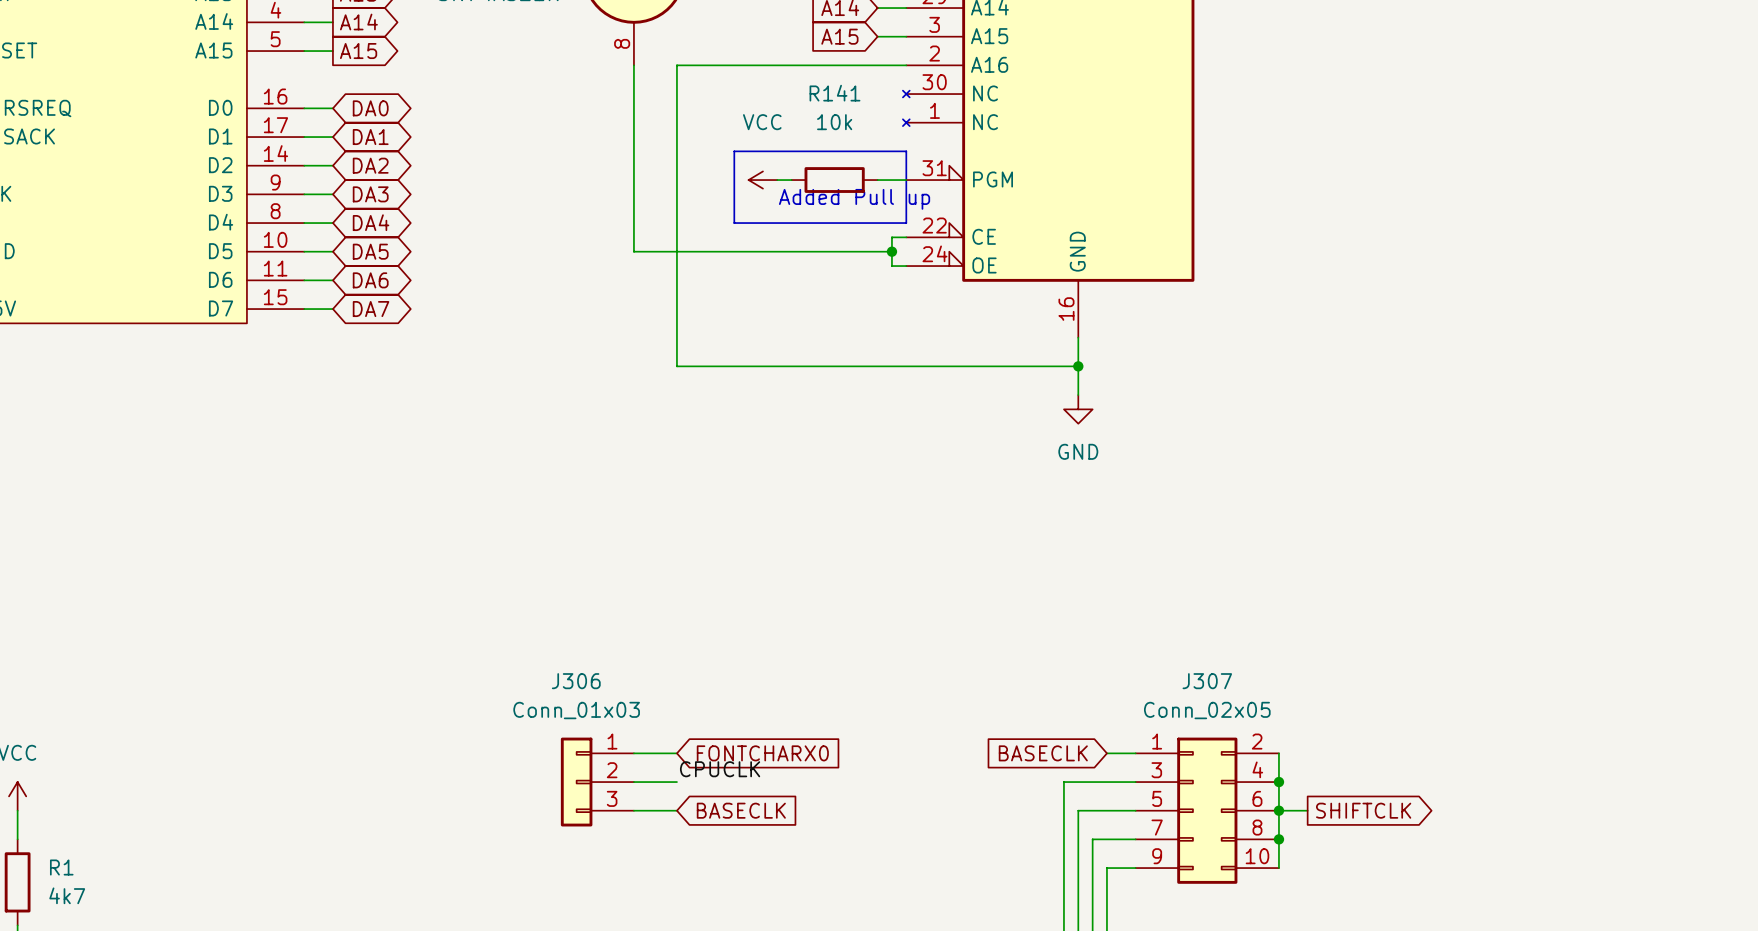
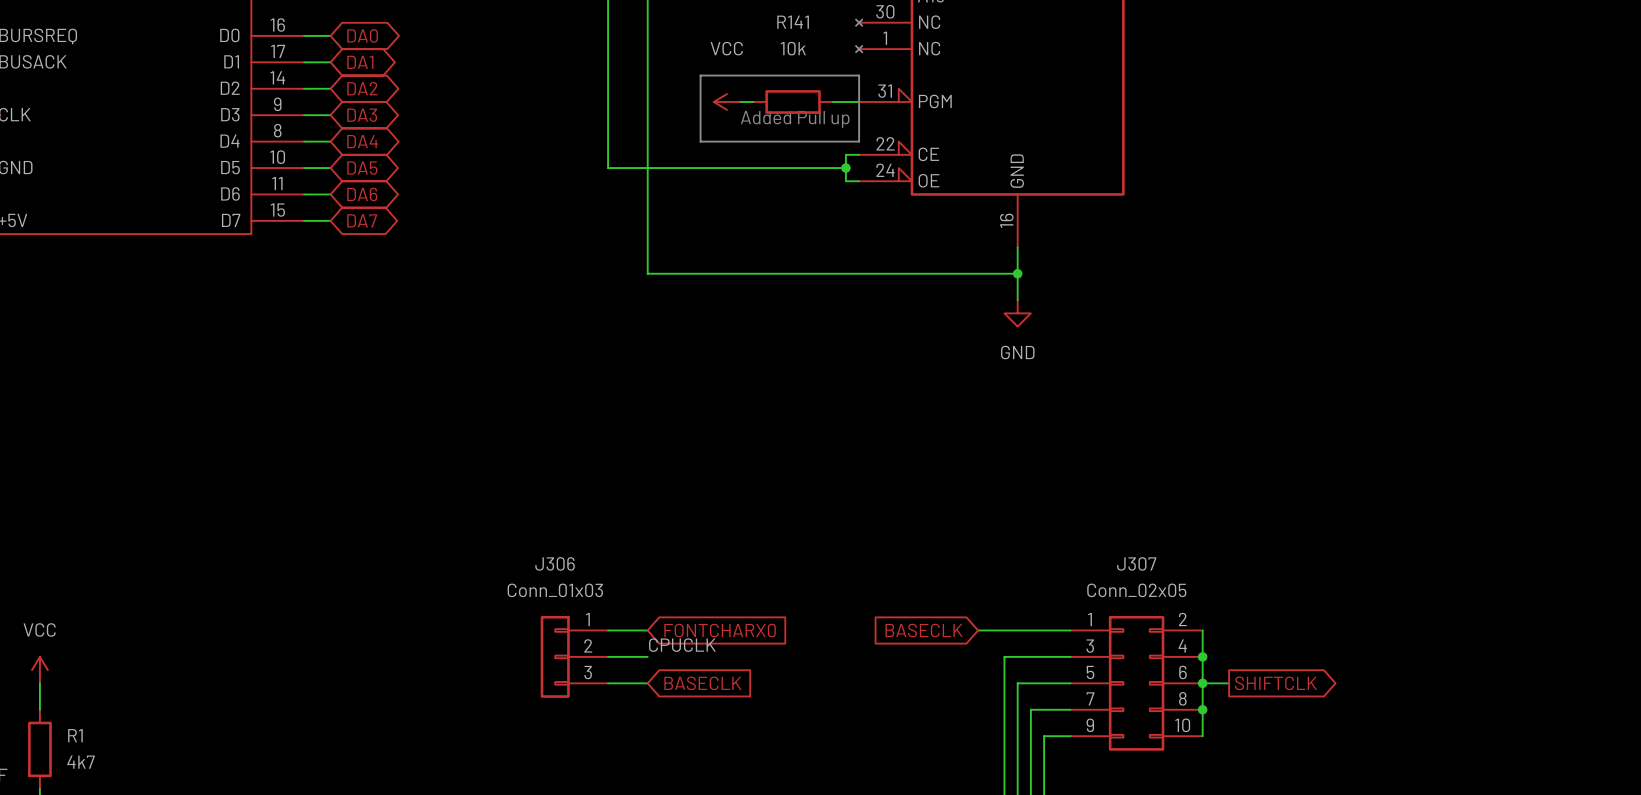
wire: none -> (978, 630) (1044, 630)
global label position: BASECLK (1043, 753) -> BASECLK (924, 630)

